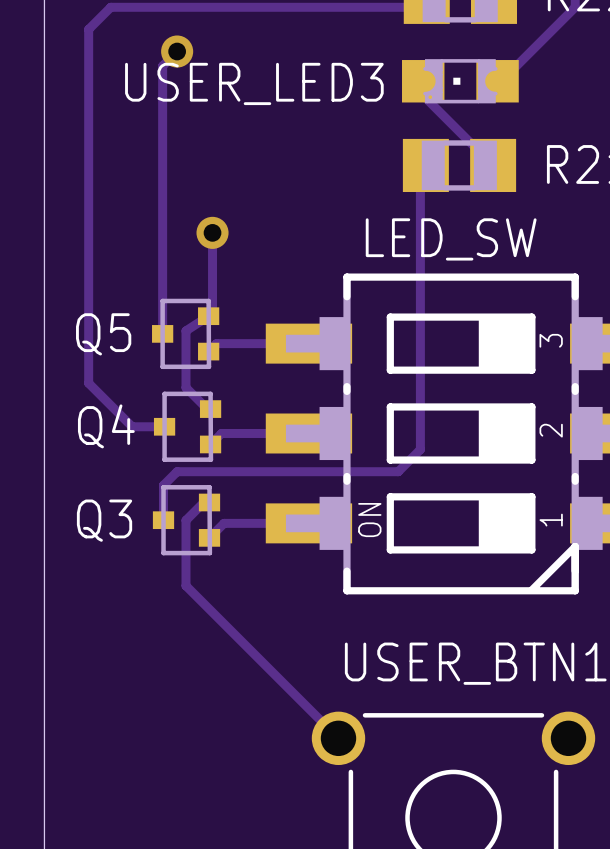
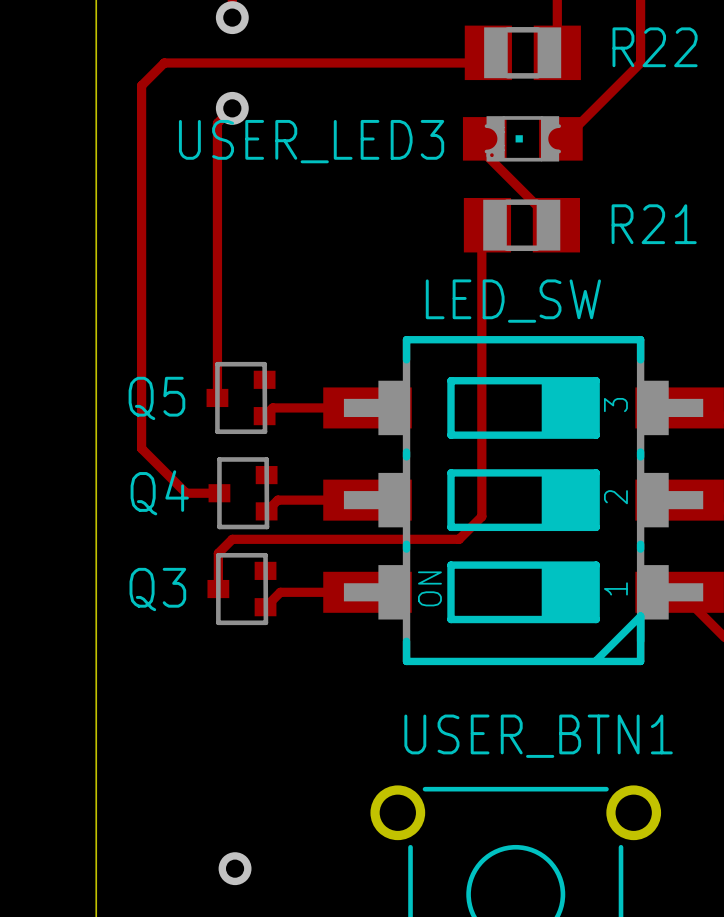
track: (212, 232) (212, 312) (185, 330) (185, 387) (207, 409) (210, 409) -> none
via: (212, 232) -> none
track: (209, 502) (203, 502) (185, 520) (185, 585) (338, 738) -> none
via: none -> (235, 868)

